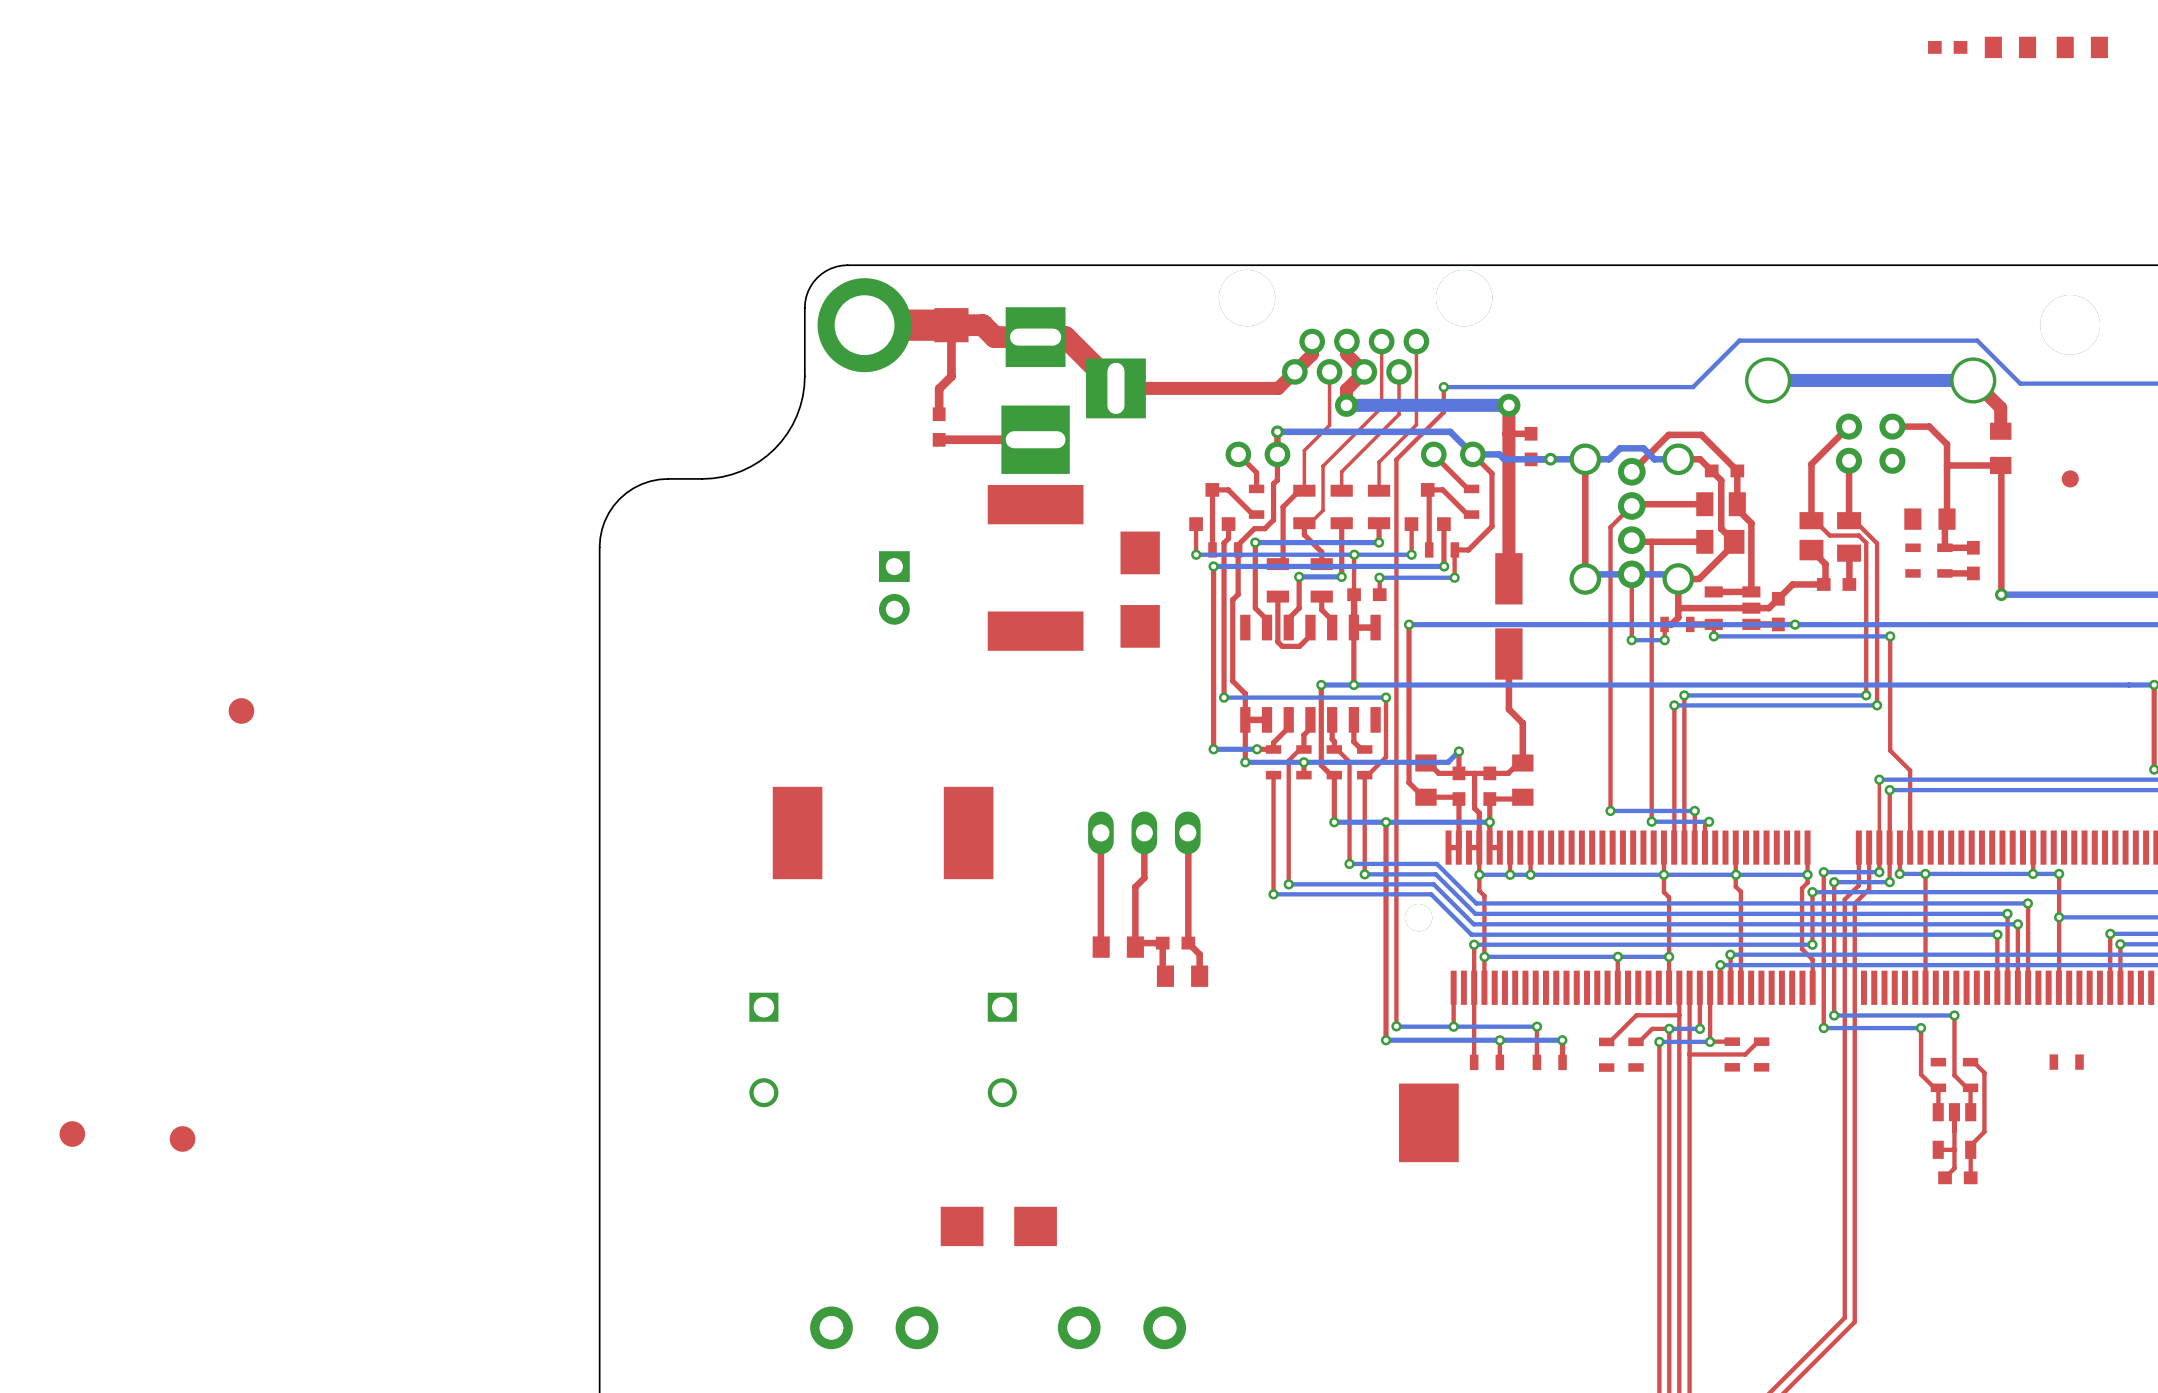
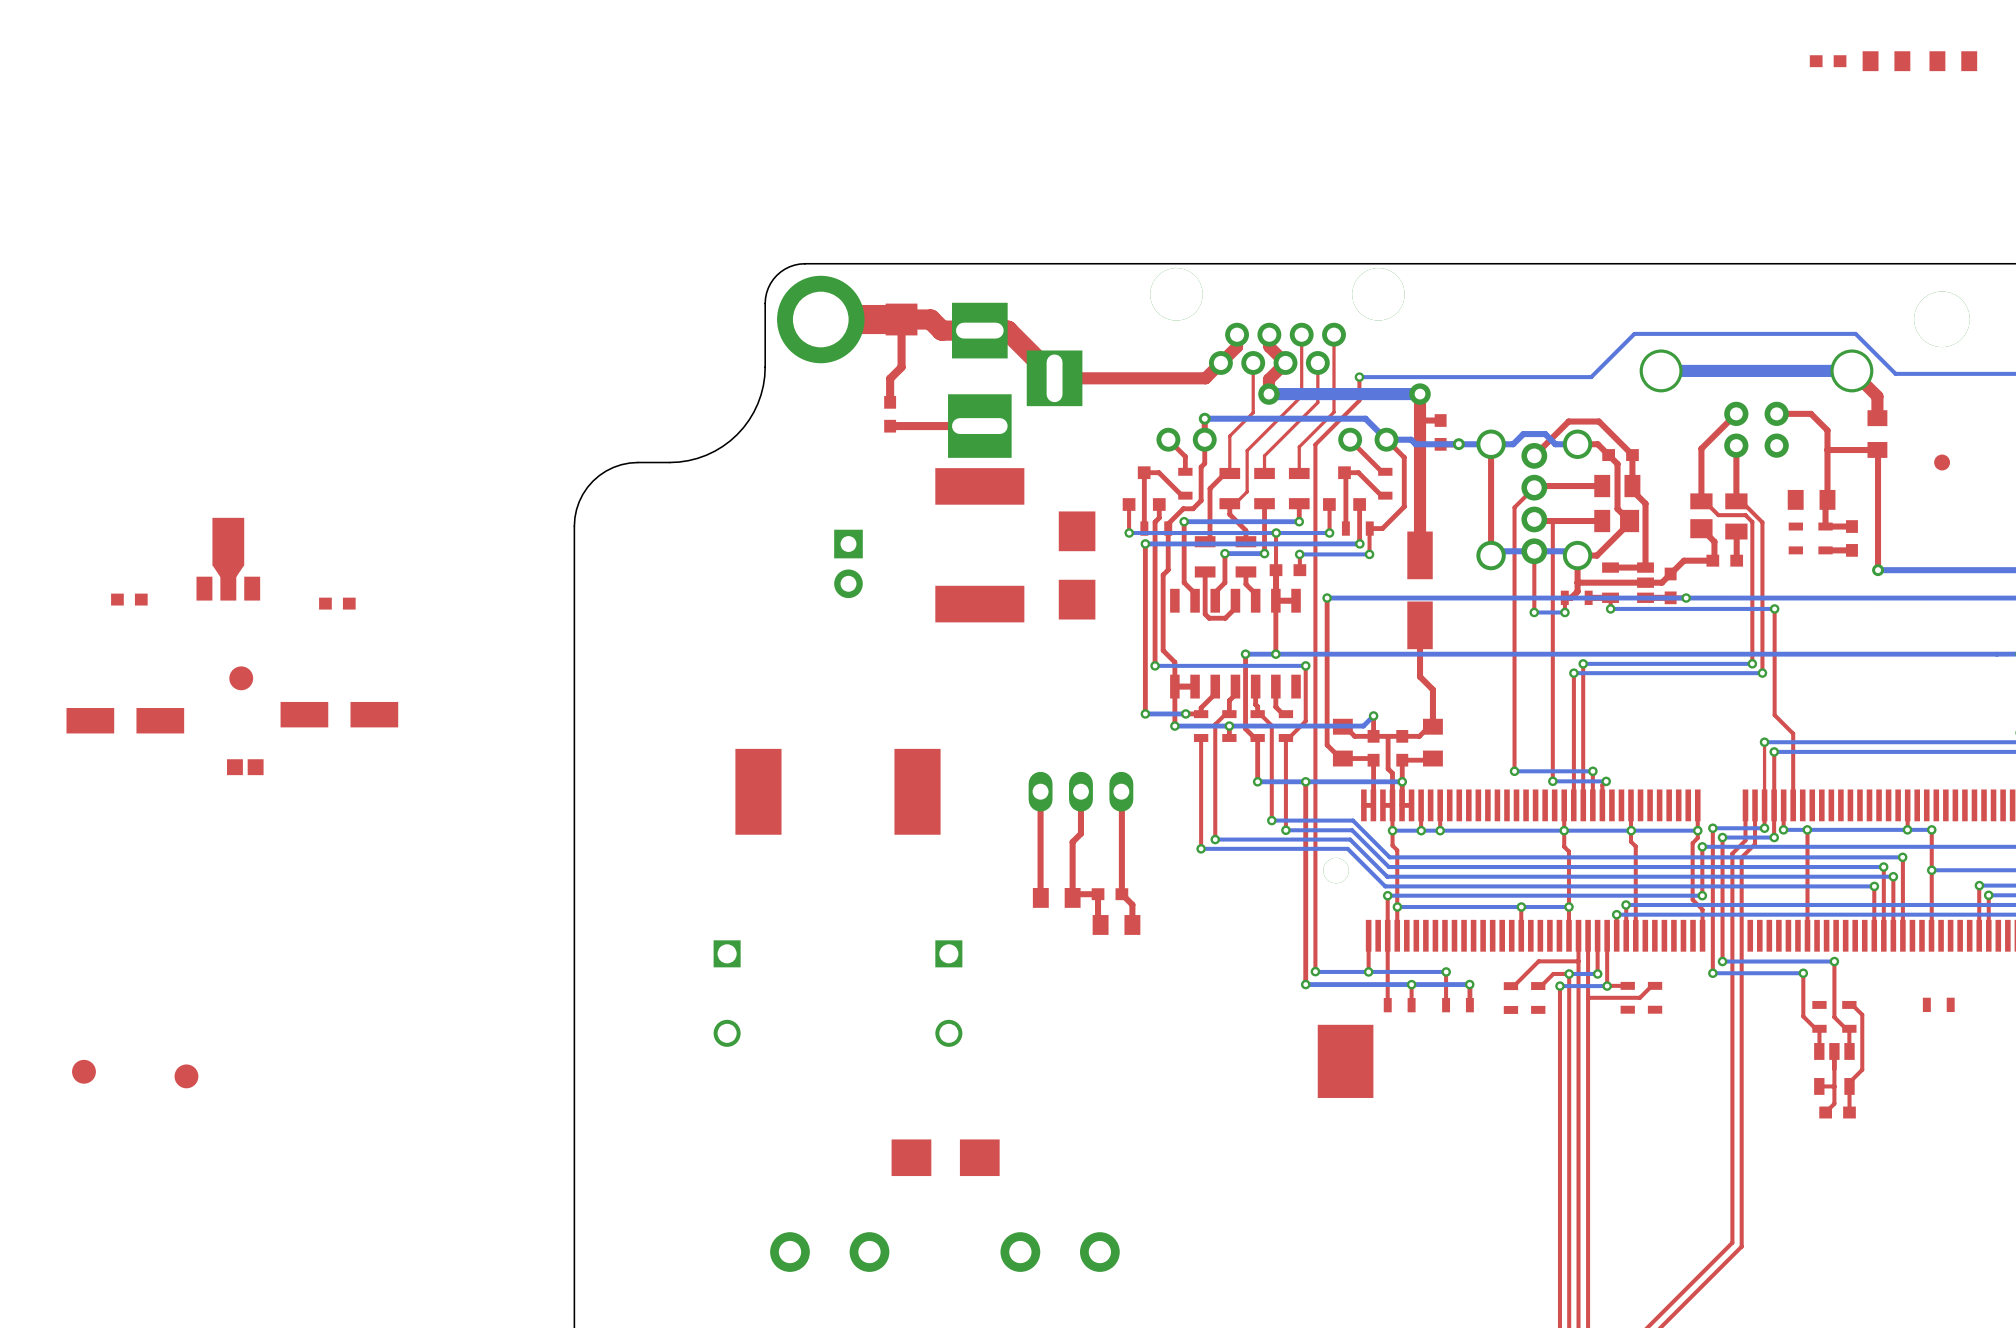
part: none -> (228, 559)
part: none -> (129, 599)
part: none -> (337, 603)
part: none -> (339, 714)
part: none -> (125, 720)
part: none -> (245, 767)

